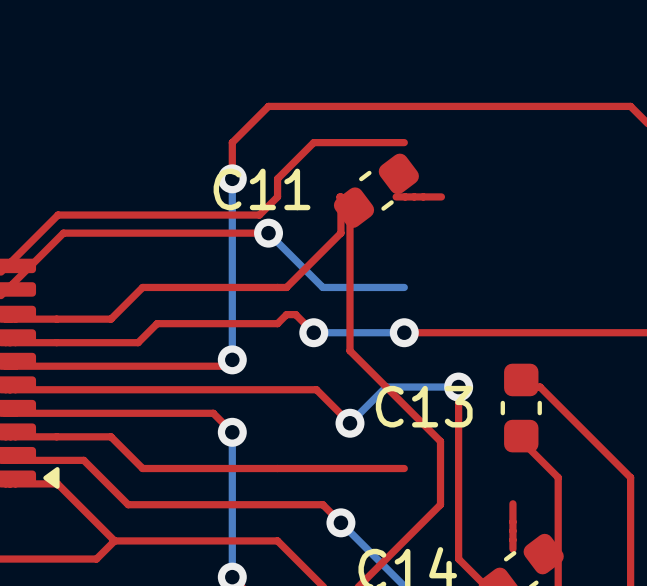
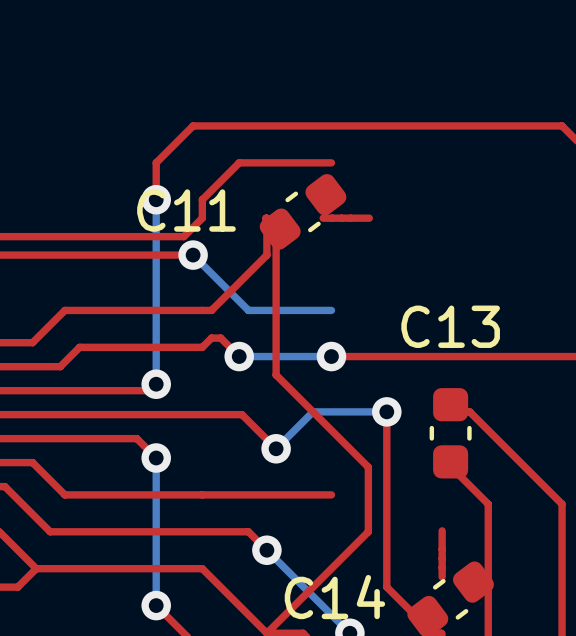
C13 name position: C13 (424, 406) -> C13 (450, 326)

